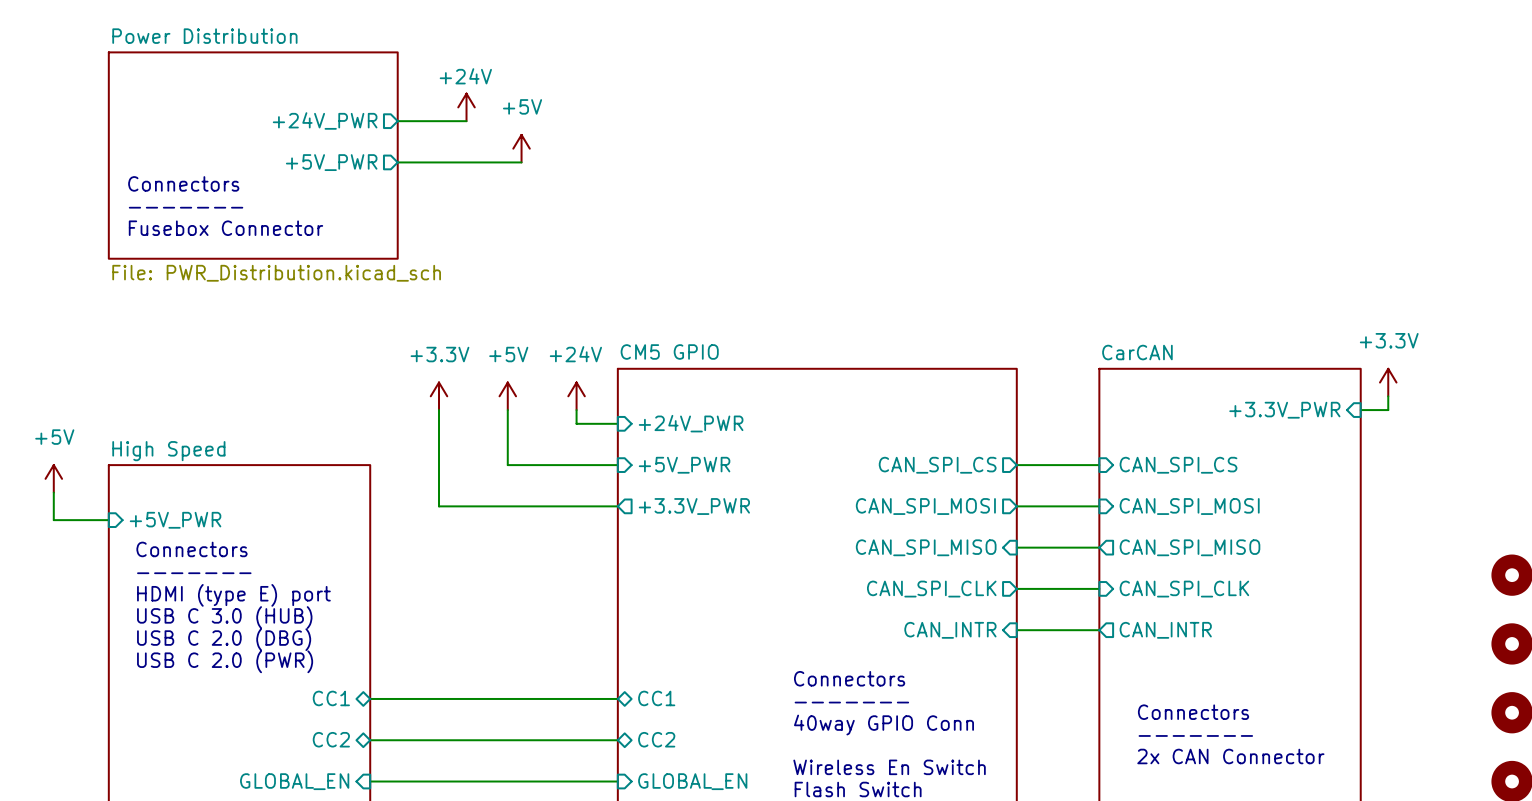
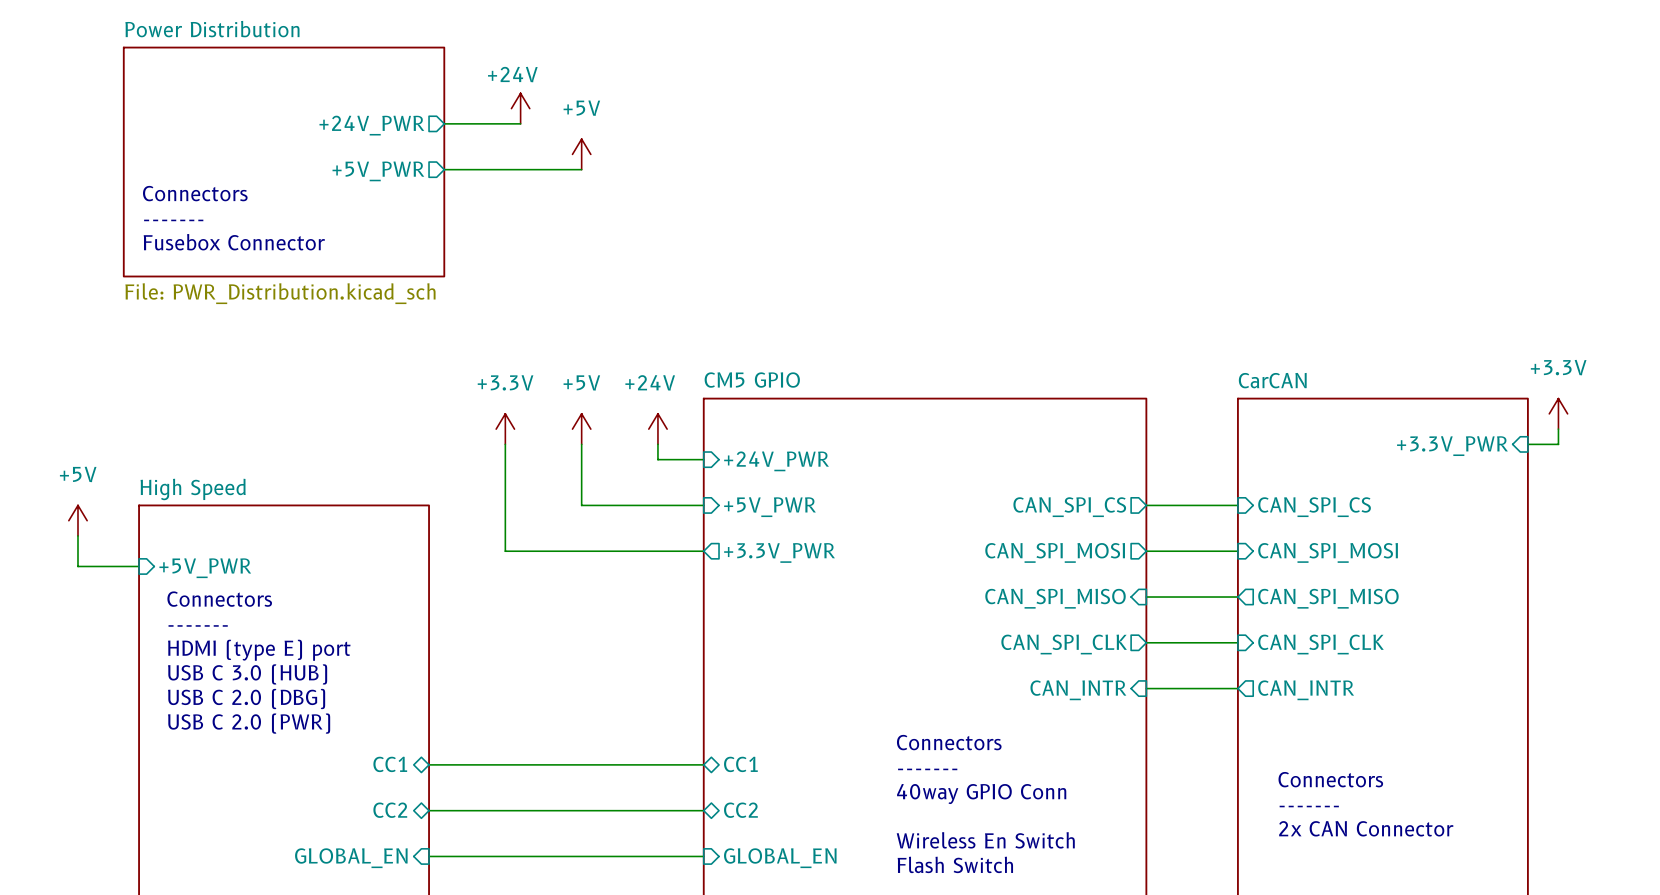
power symbol position: +24V (466, 107) -> +24V (520, 108)
sheet pin position: +24V_PWR (325, 120) -> +24V_PWR (371, 125)
wire: (452, 121) (466, 121) -> (444, 123) (459, 123)
power symbol position: +5V (521, 148) -> +5V (581, 154)
sheet Power Distribution position: (253, 155) -> (284, 162)
sheet pin position: +5V_PWR (331, 162) -> +5V_PWR (378, 171)
wire: (507, 162) (521, 162) -> (444, 169) (459, 169)
text position: Connectors (183, 183) -> Connectors (195, 193)
text position: ------- (186, 207) -> ------- (173, 220)
text position: Fusebox Connector (226, 228) -> Fusebox Connector (234, 242)

